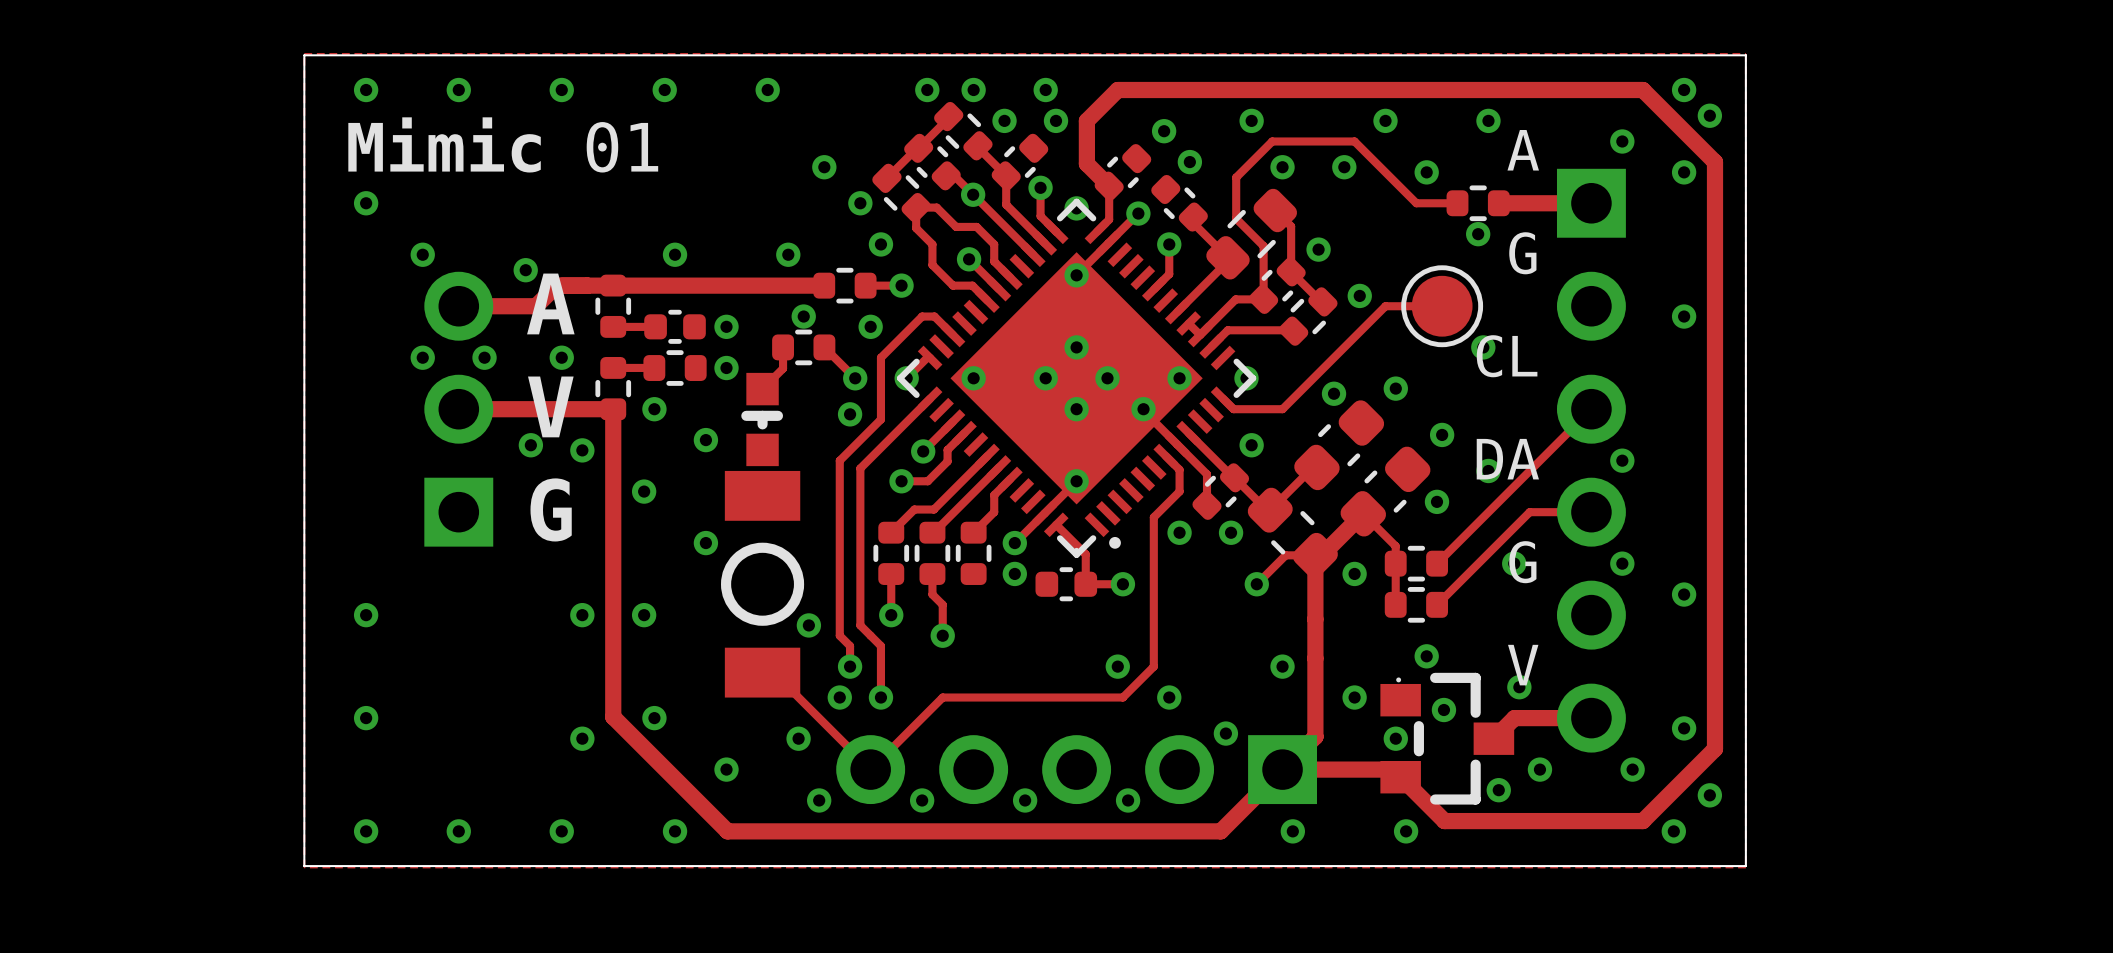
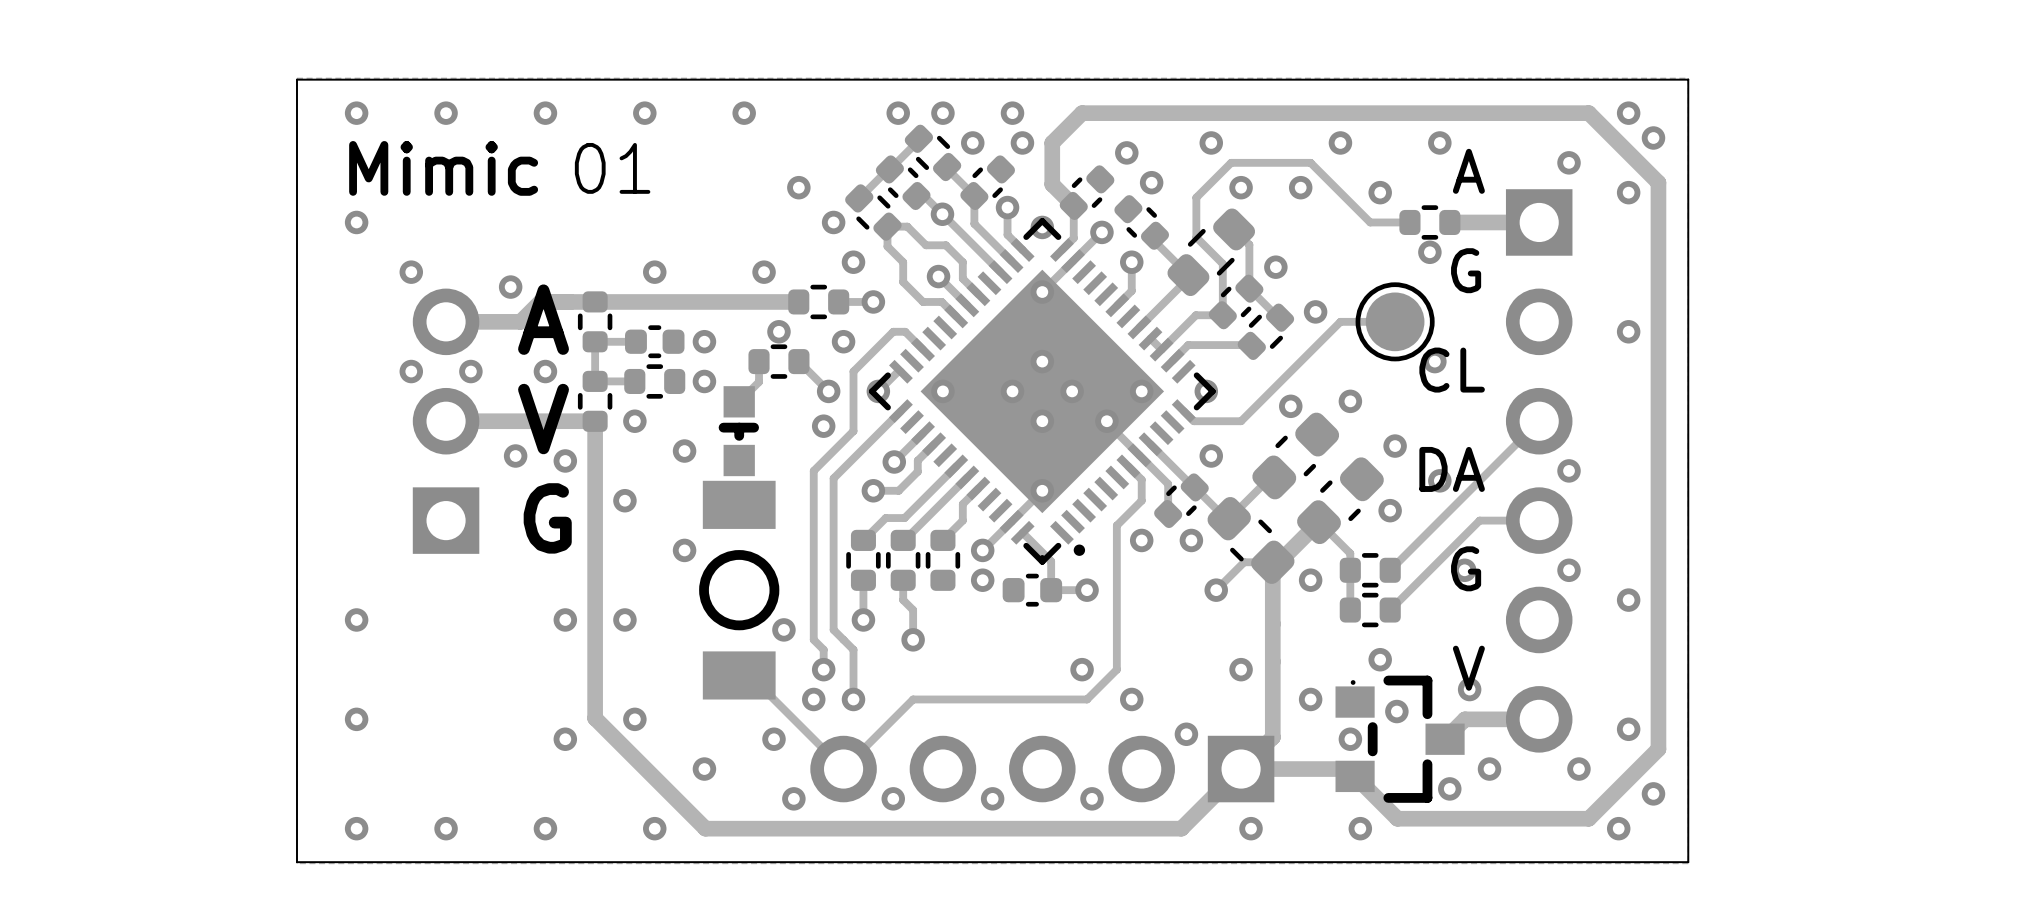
track: none -> (595, 341) (595, 381)

